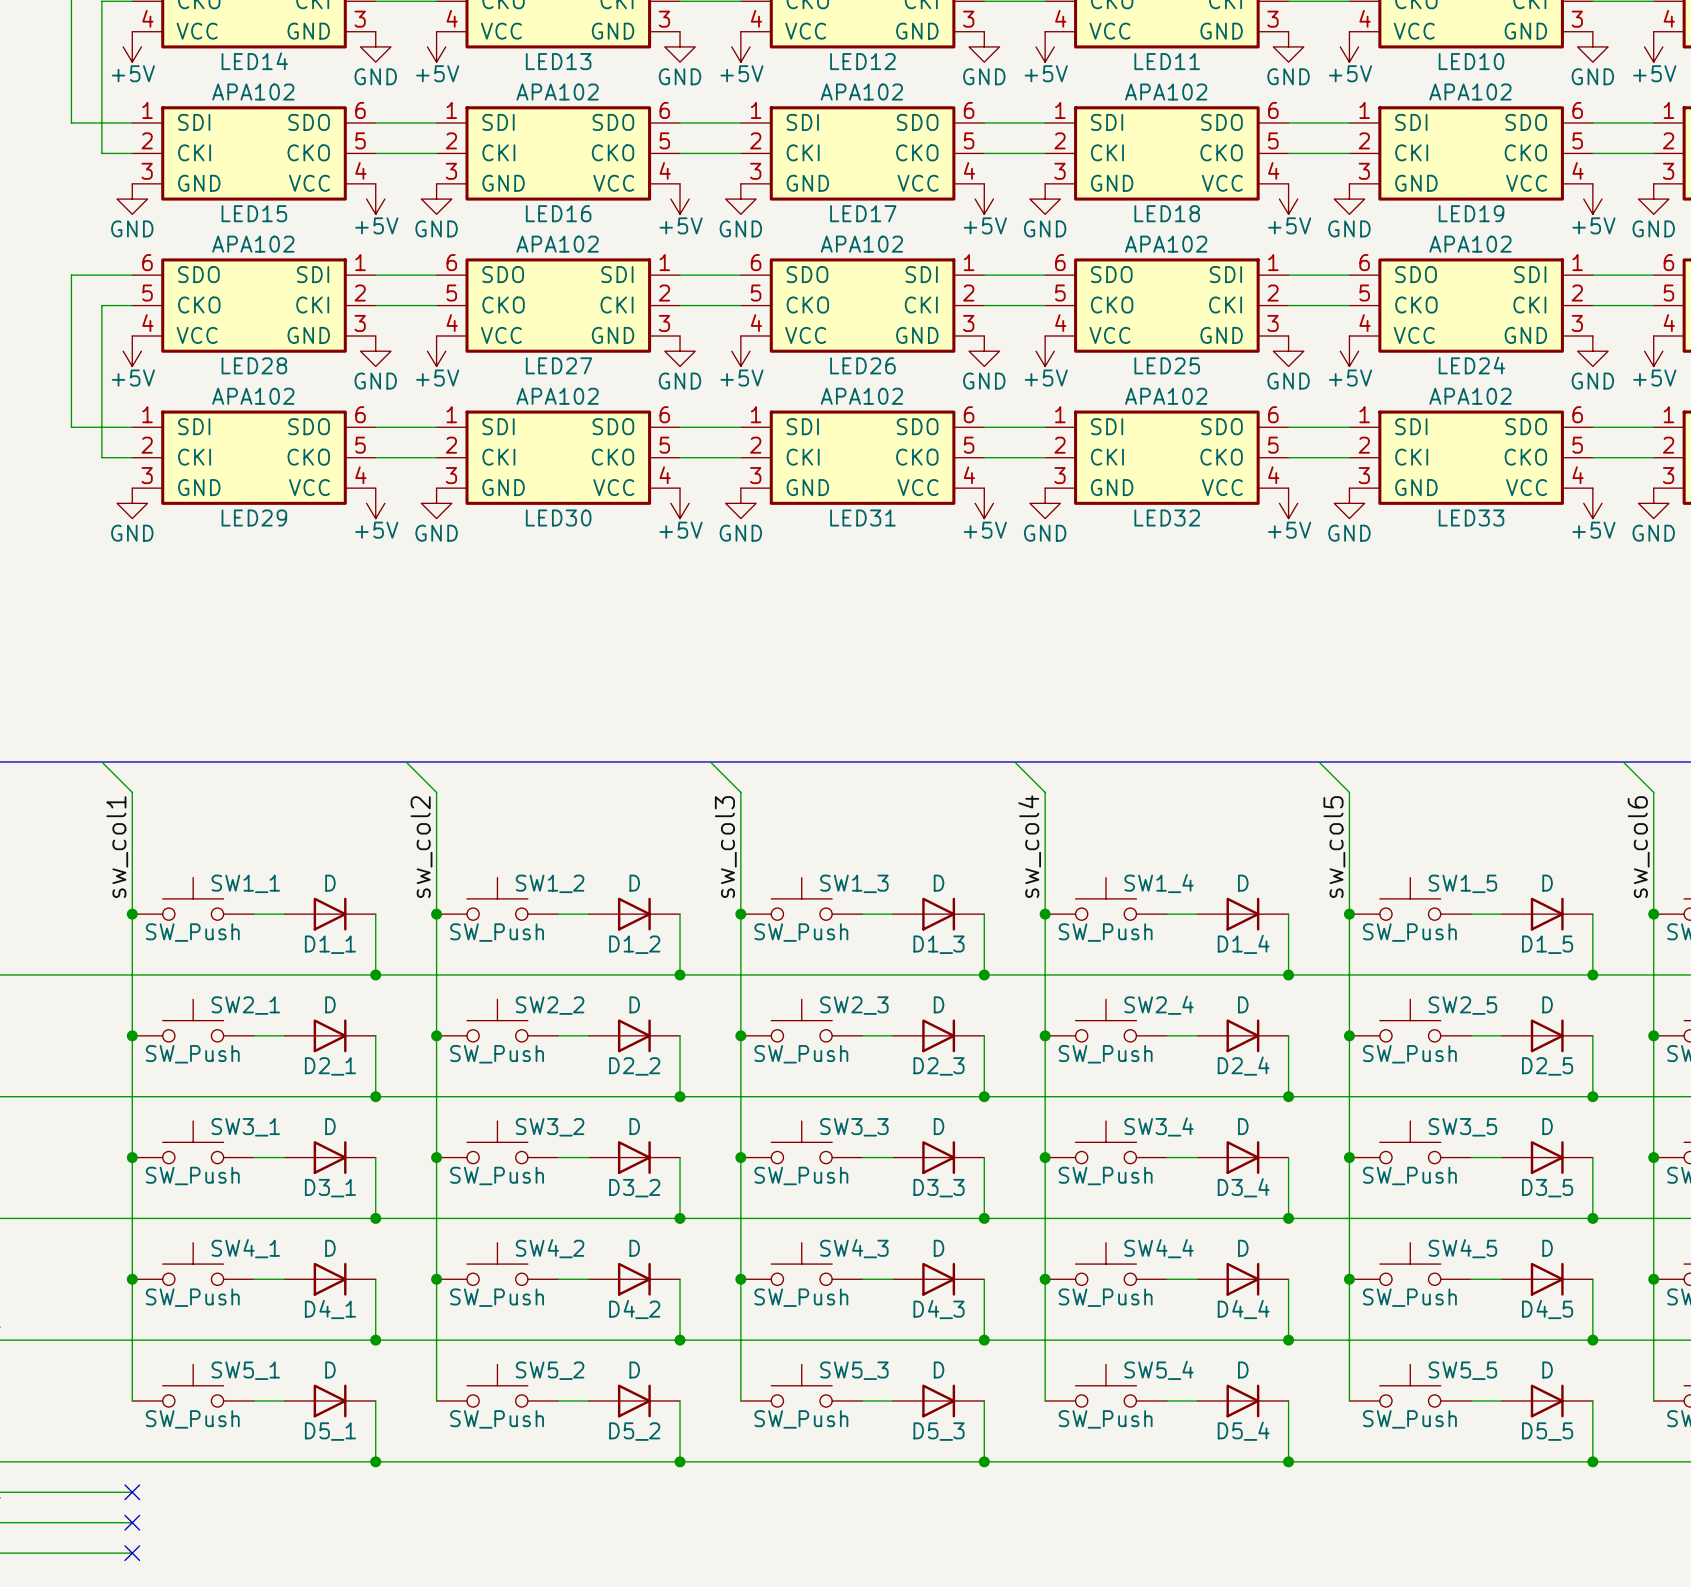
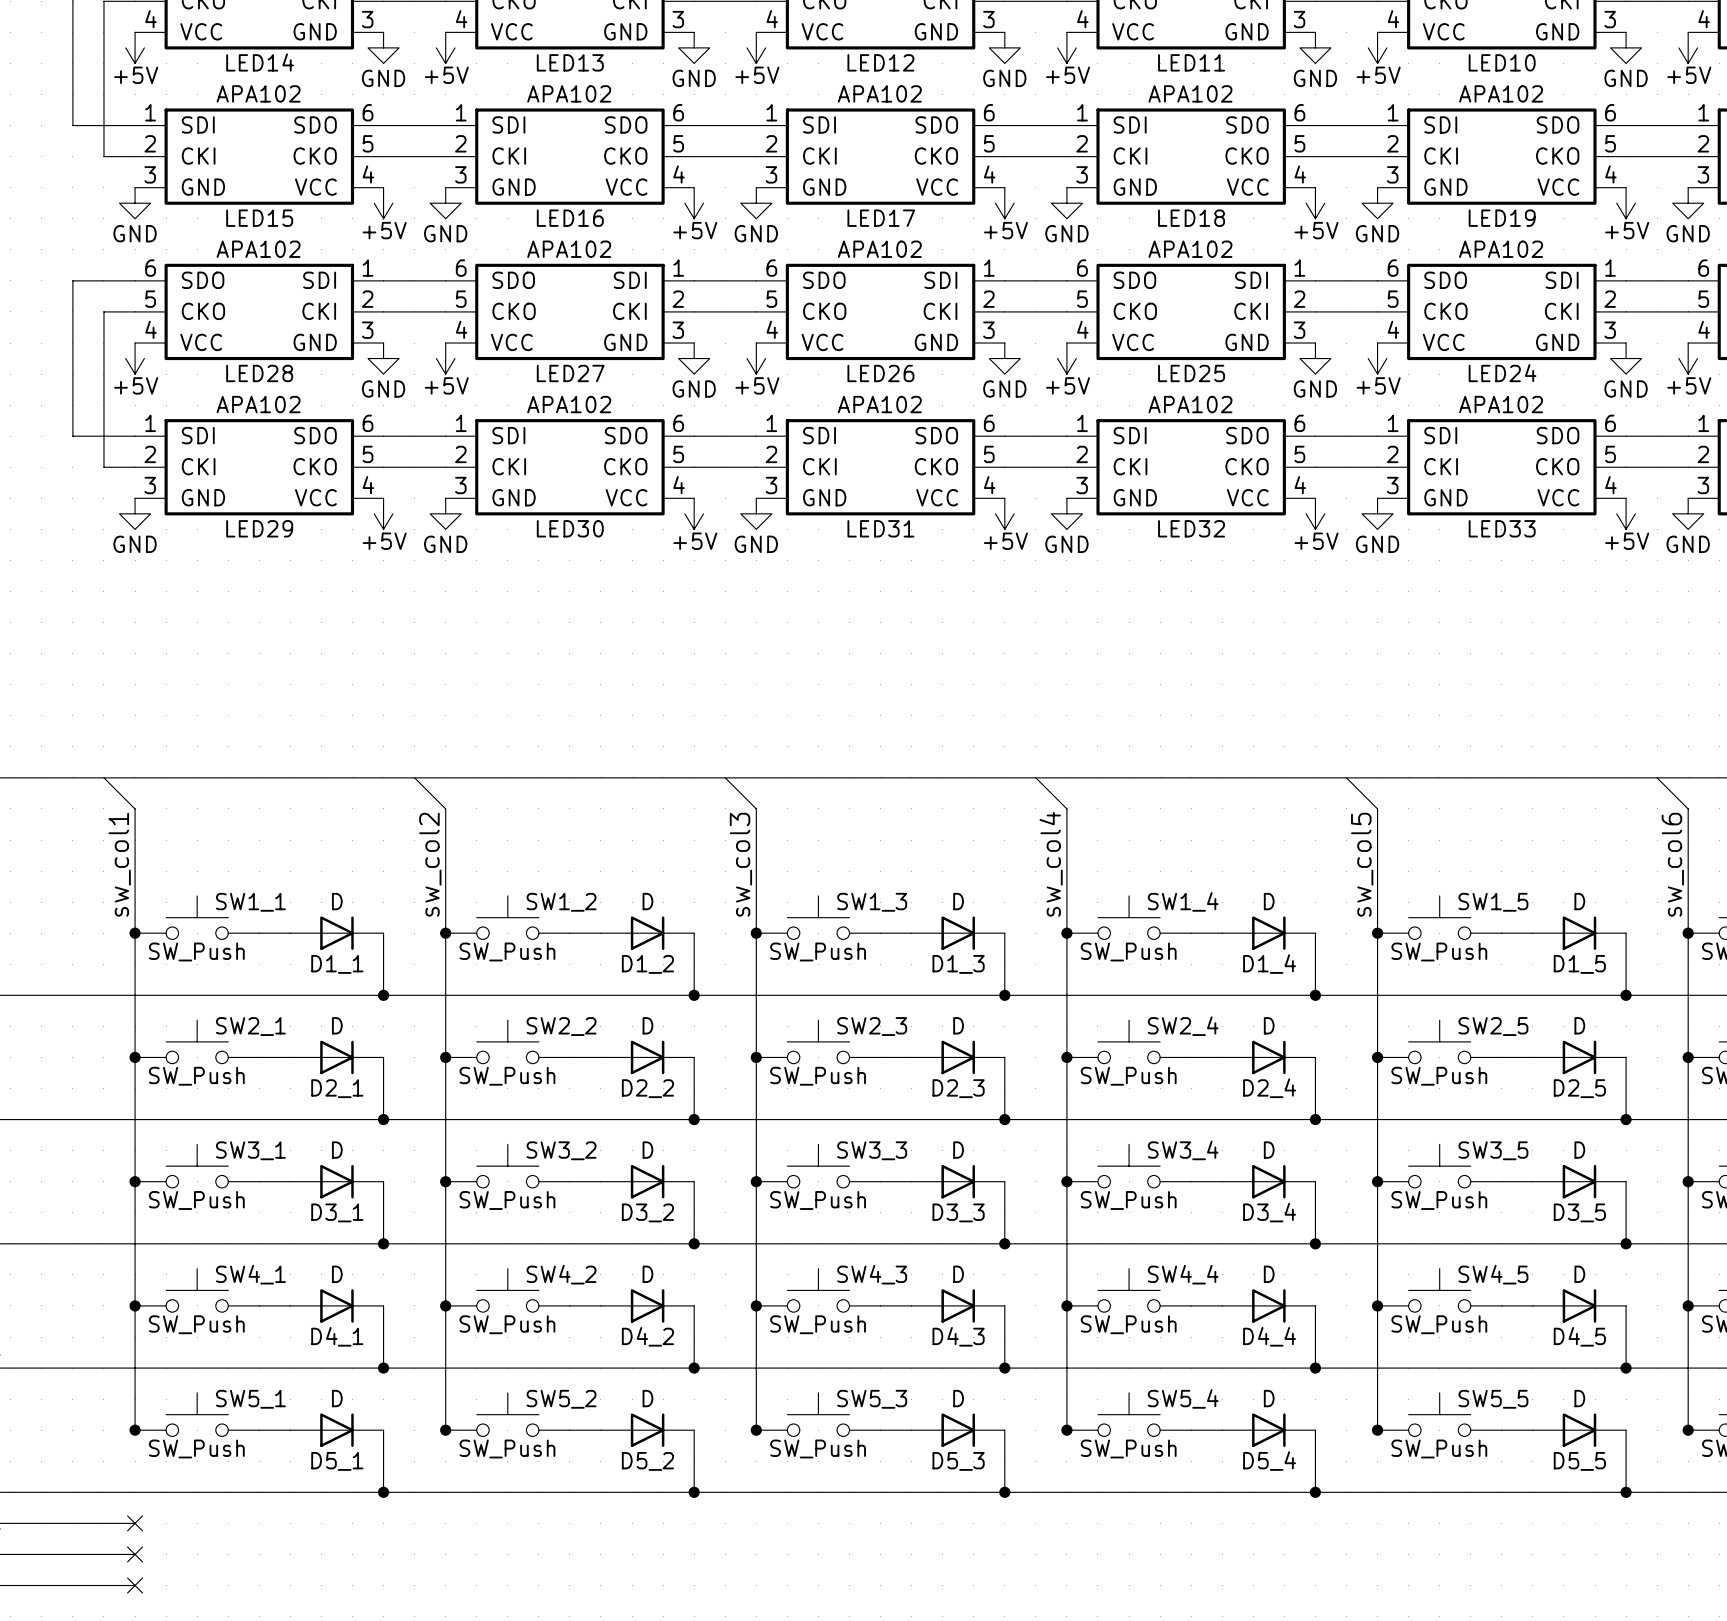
junction: none -> (135, 1430)
junction: none -> (445, 1430)
junction: none -> (756, 1430)
junction: none -> (1066, 1430)
junction: none -> (1377, 1430)
junction: none -> (1688, 1430)

